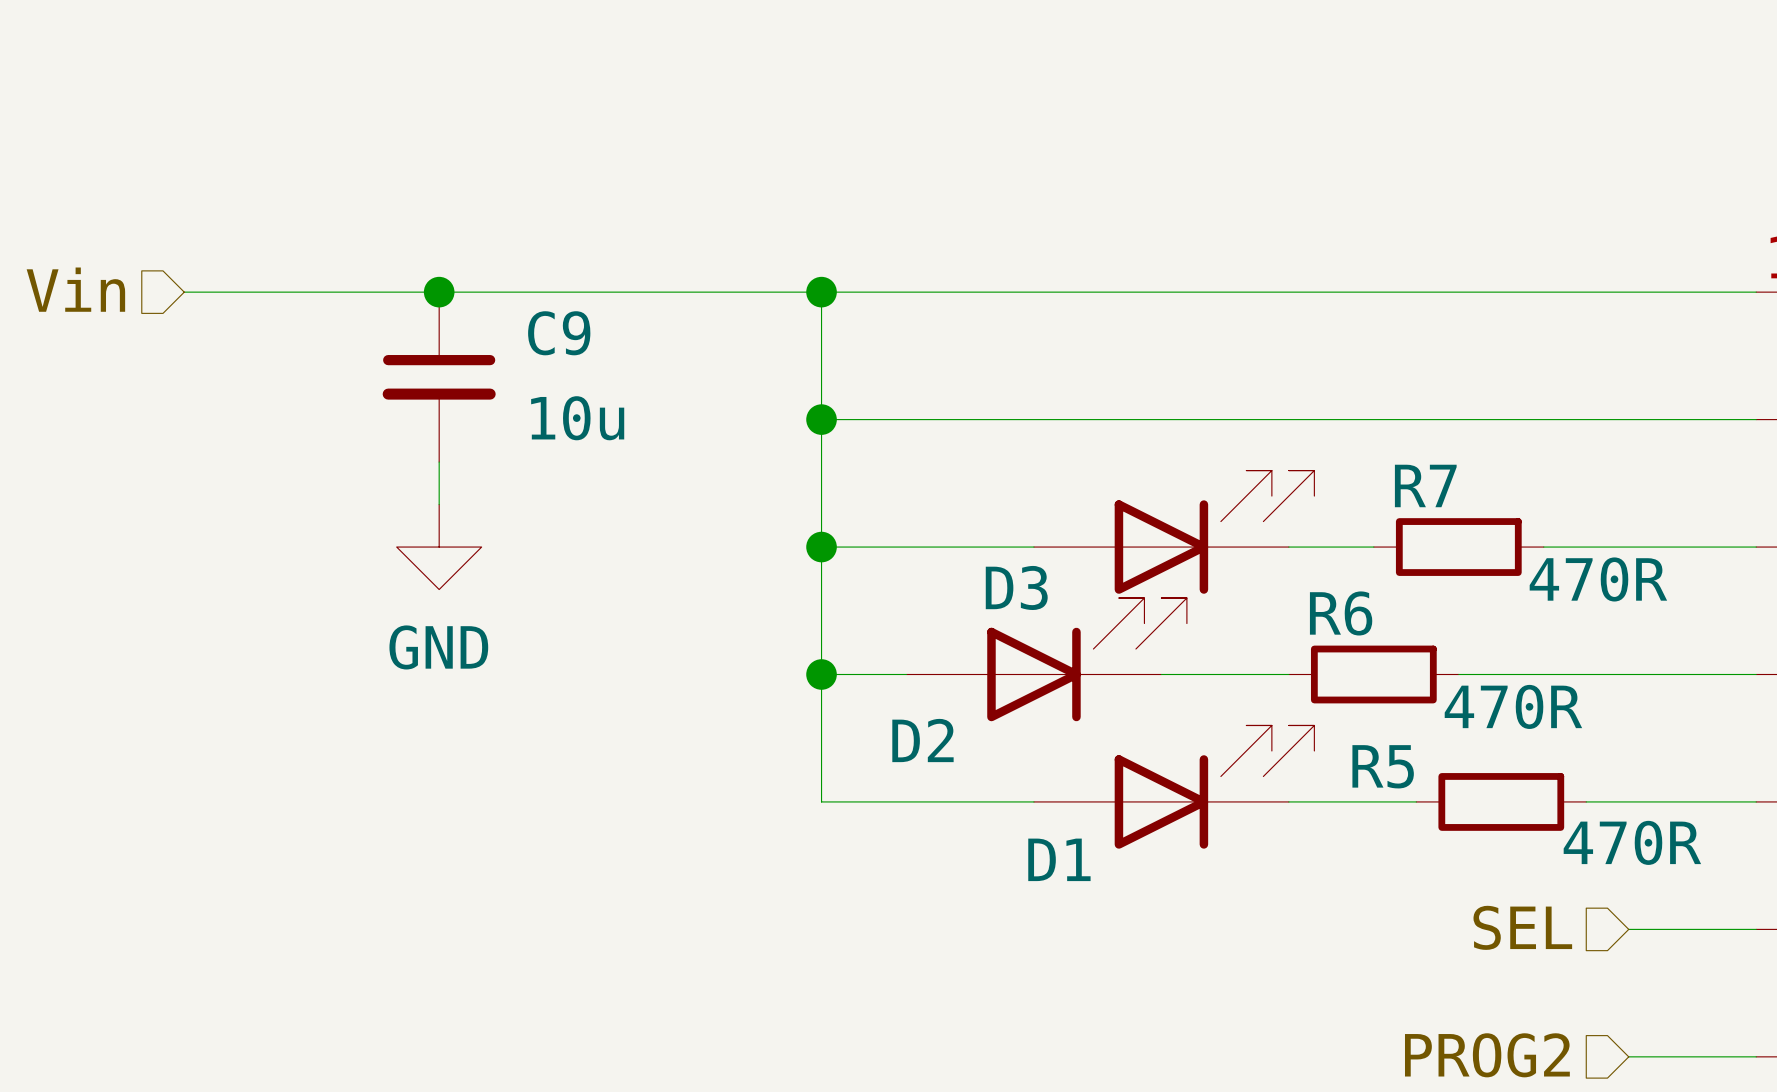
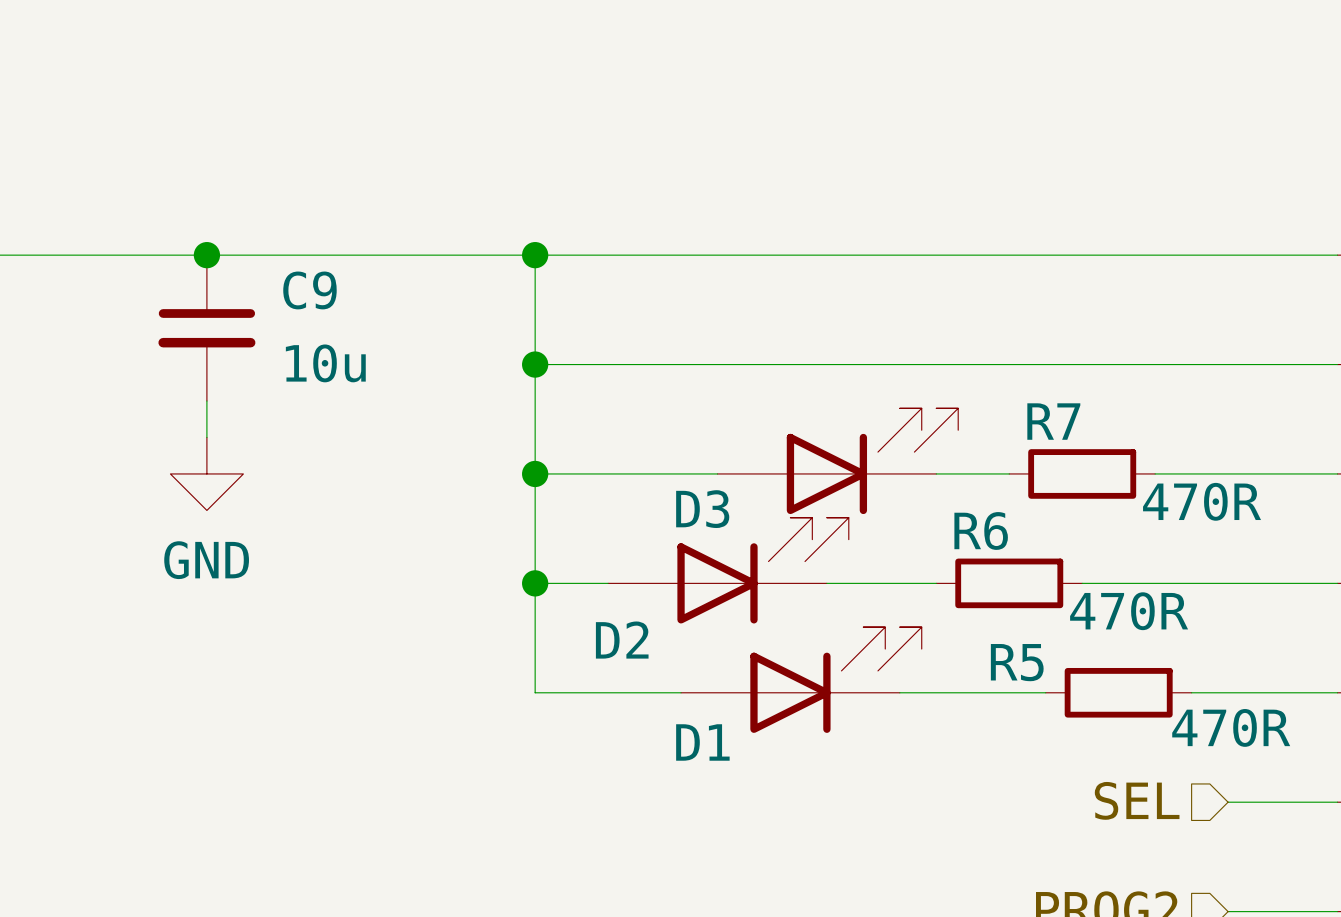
D1 position: (1174, 787) -> (801, 680)

